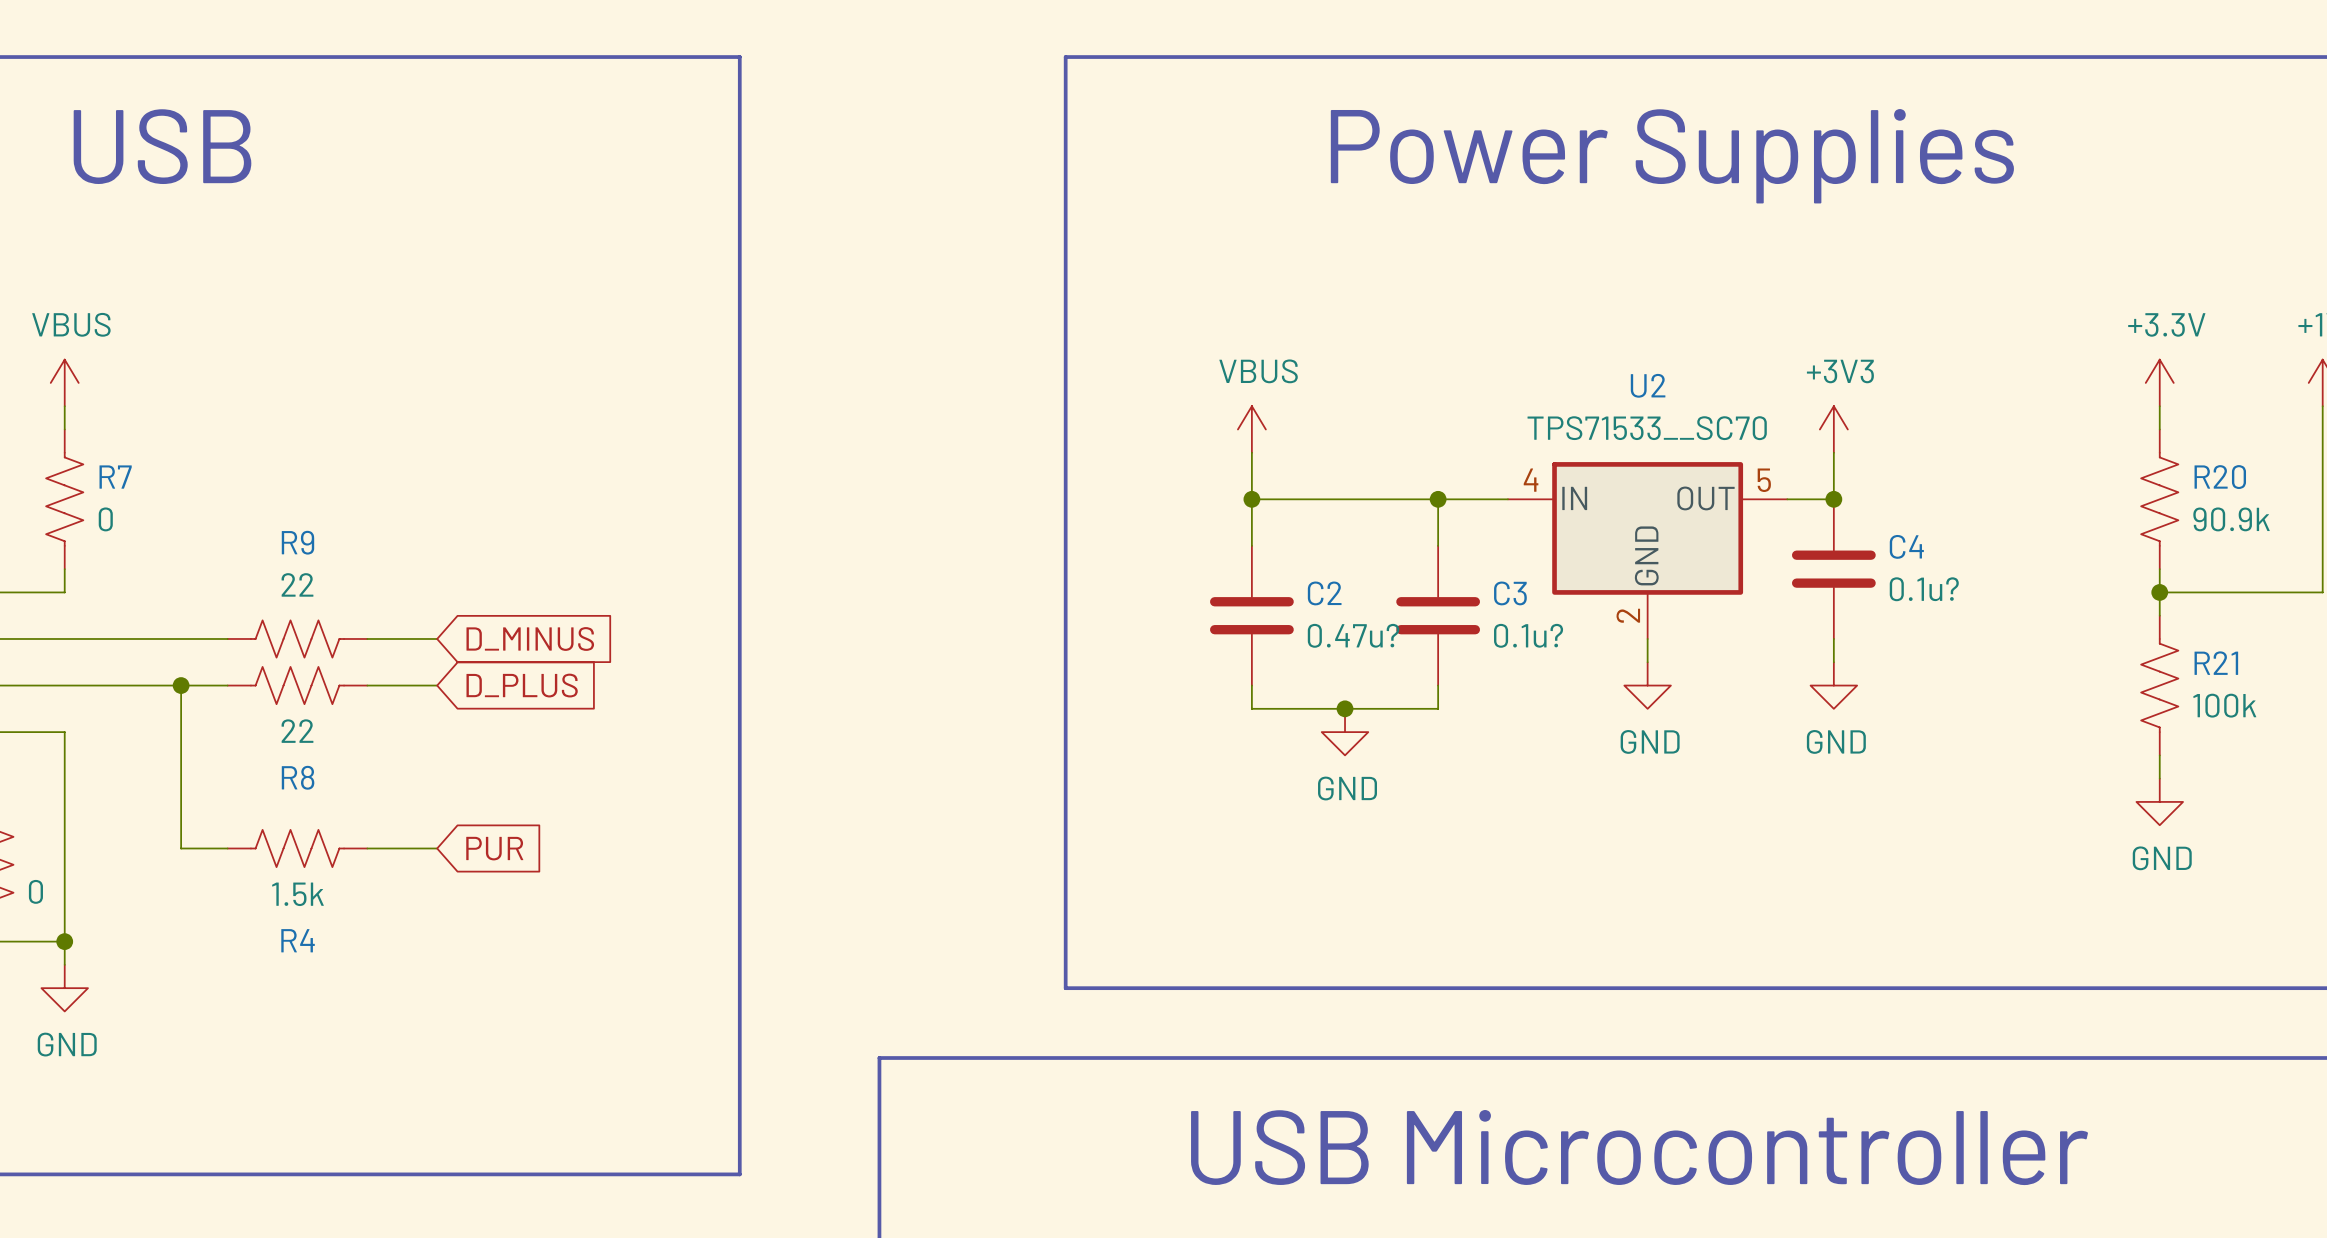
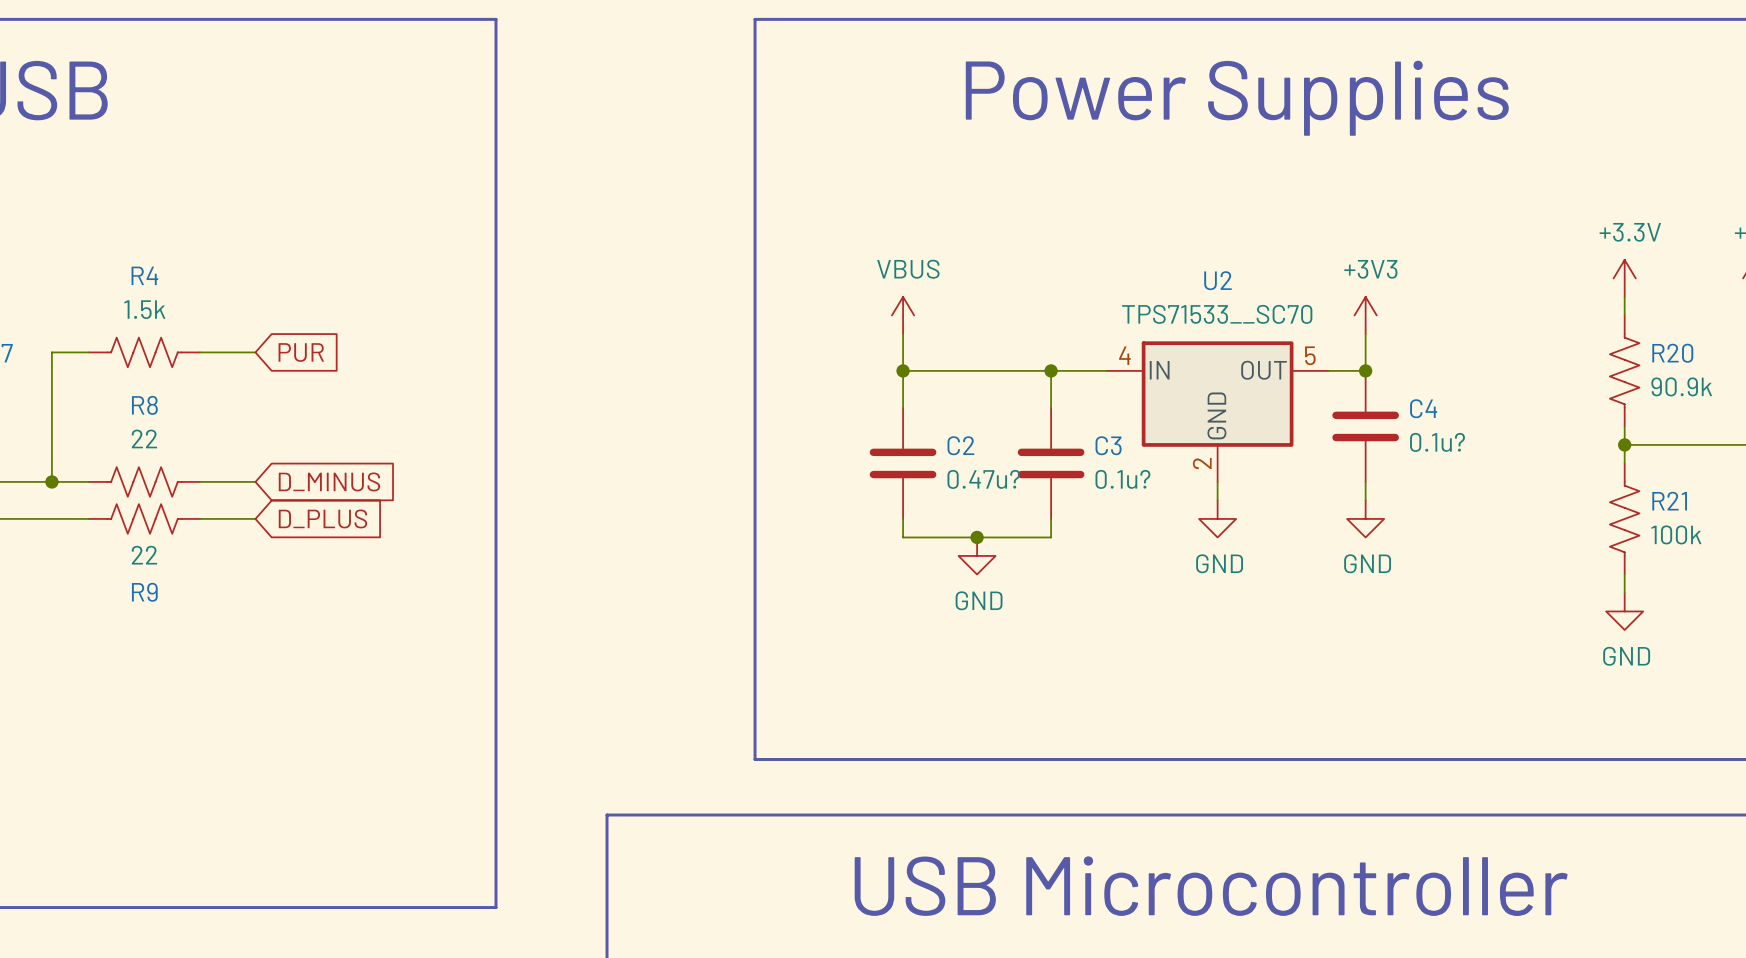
wire: none -> (88, 352) (51, 352) (51, 481)
R9 name: R9 (297, 542) -> R8 (144, 405)
wire: (181, 685) (181, 848) (227, 848) -> none
junction position: (181, 685) -> (51, 481)
R8 name: R8 (298, 777) -> R9 (144, 592)
R4 position: (297, 848) -> (144, 352)
wire: (367, 848) (437, 848) -> (199, 352) (255, 352)
global label position: PUR (494, 848) -> PUR (301, 352)
R4 value position: 1.5k (297, 894) -> 1.5k (144, 309)
R4 name position: R4 (298, 940) -> R4 (144, 275)

